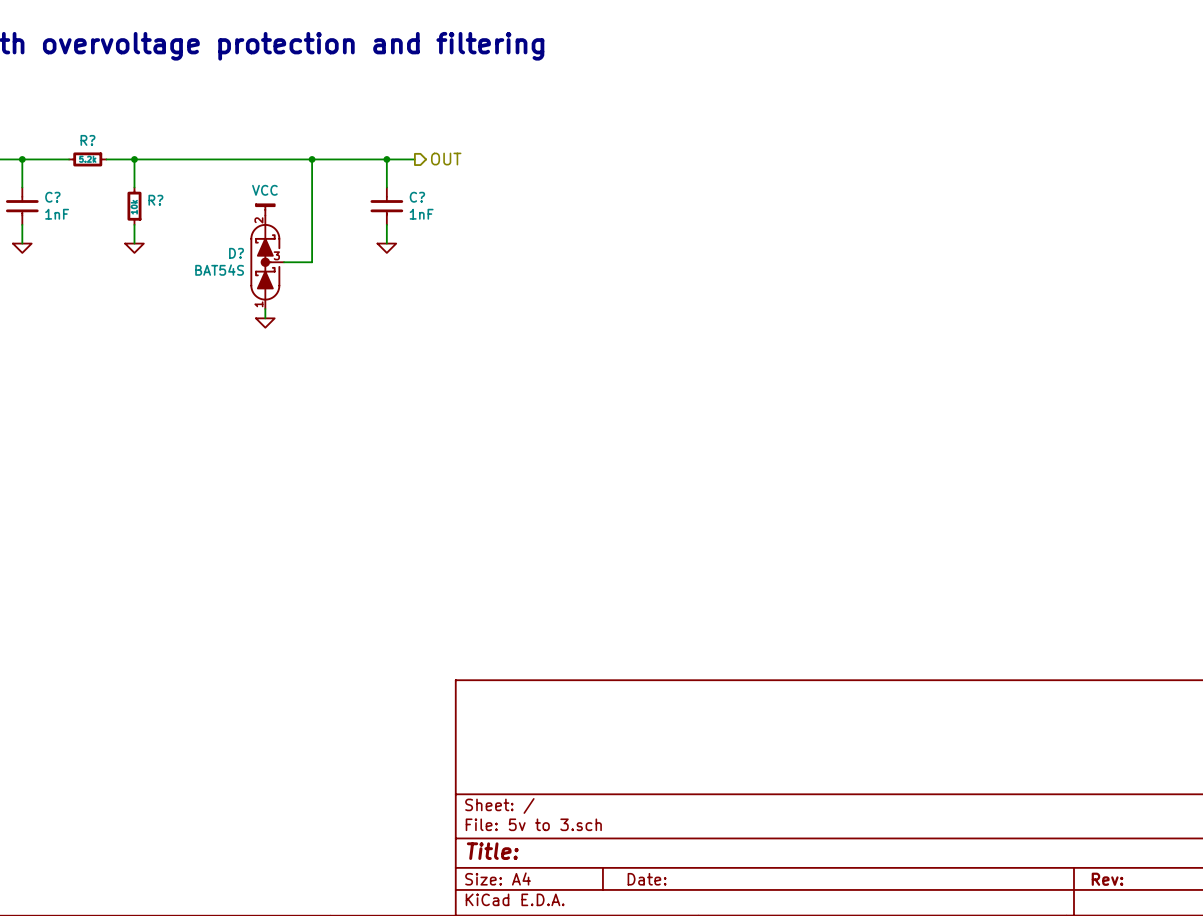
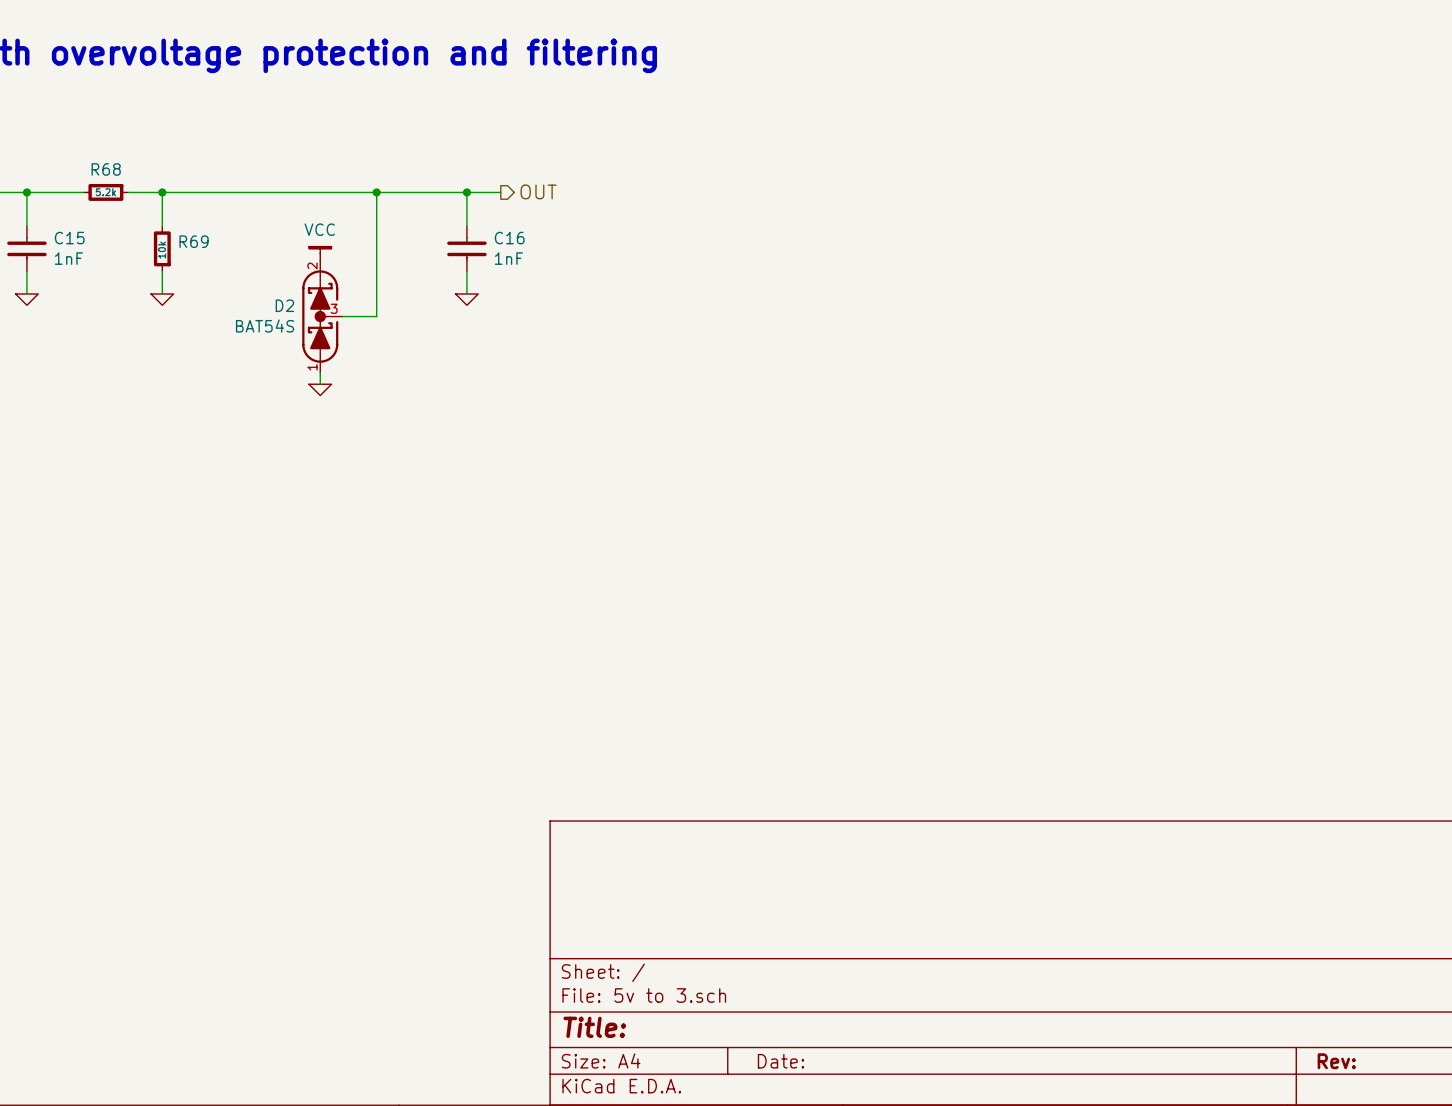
R? name: R? (87, 140) -> R68 (106, 169)
C? name: C? (52, 197) -> C15 (69, 238)
C? name: C? (417, 197) -> C16 (509, 238)
R? name: R? (155, 200) -> R69 (194, 241)
D? name: D? (236, 253) -> D2 (284, 305)

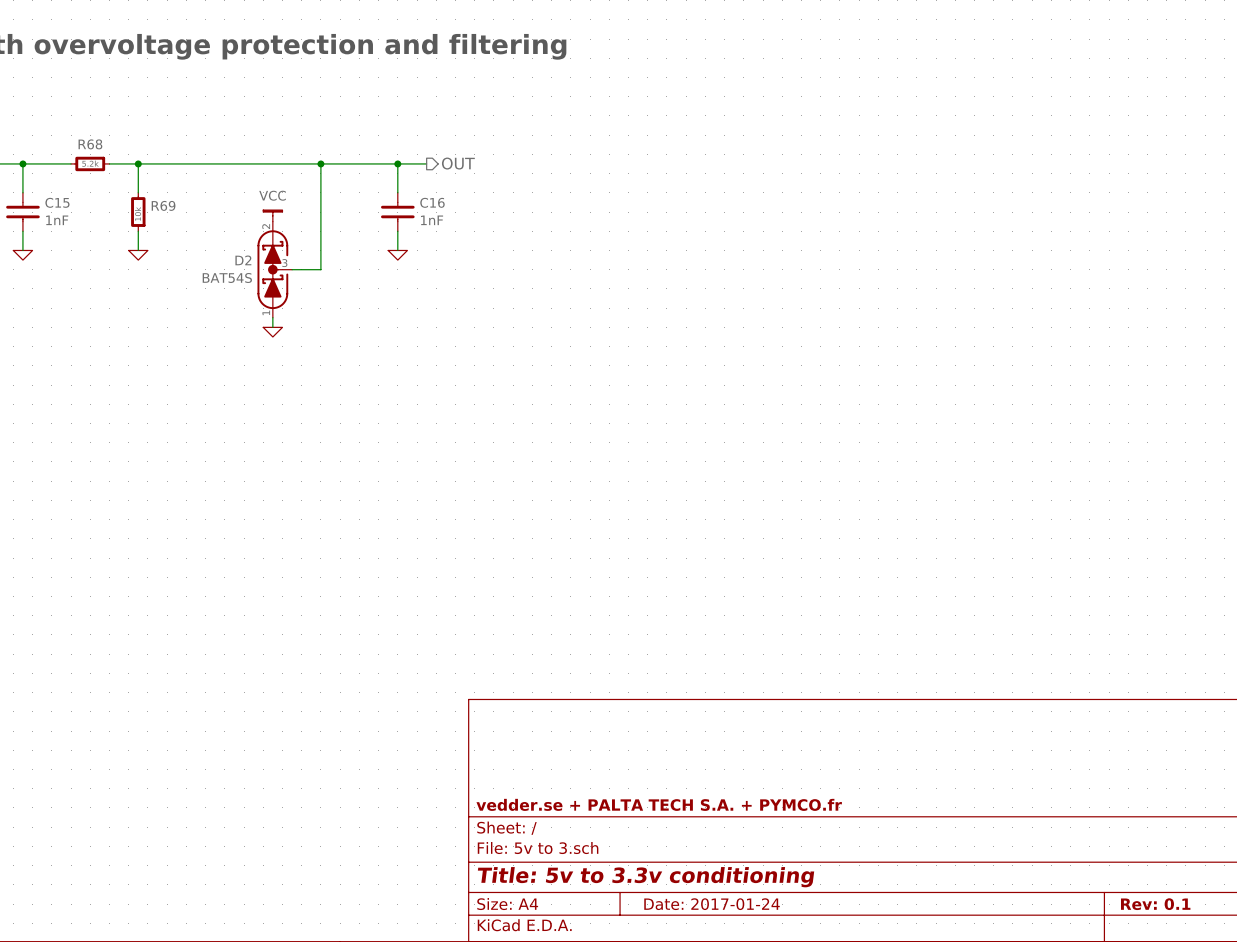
title block: none -> vedder.se + PALTA TECH S.A. + PYMCO.fr (659, 804)
title block: Title: (594, 1027) -> Title: 5v to 3.3v conditioning (646, 877)
title block: Date: (780, 1061) -> Date: 2017-01-24 (712, 904)
title block: Rev: (1336, 1061) -> Rev: 0.1 (1155, 904)

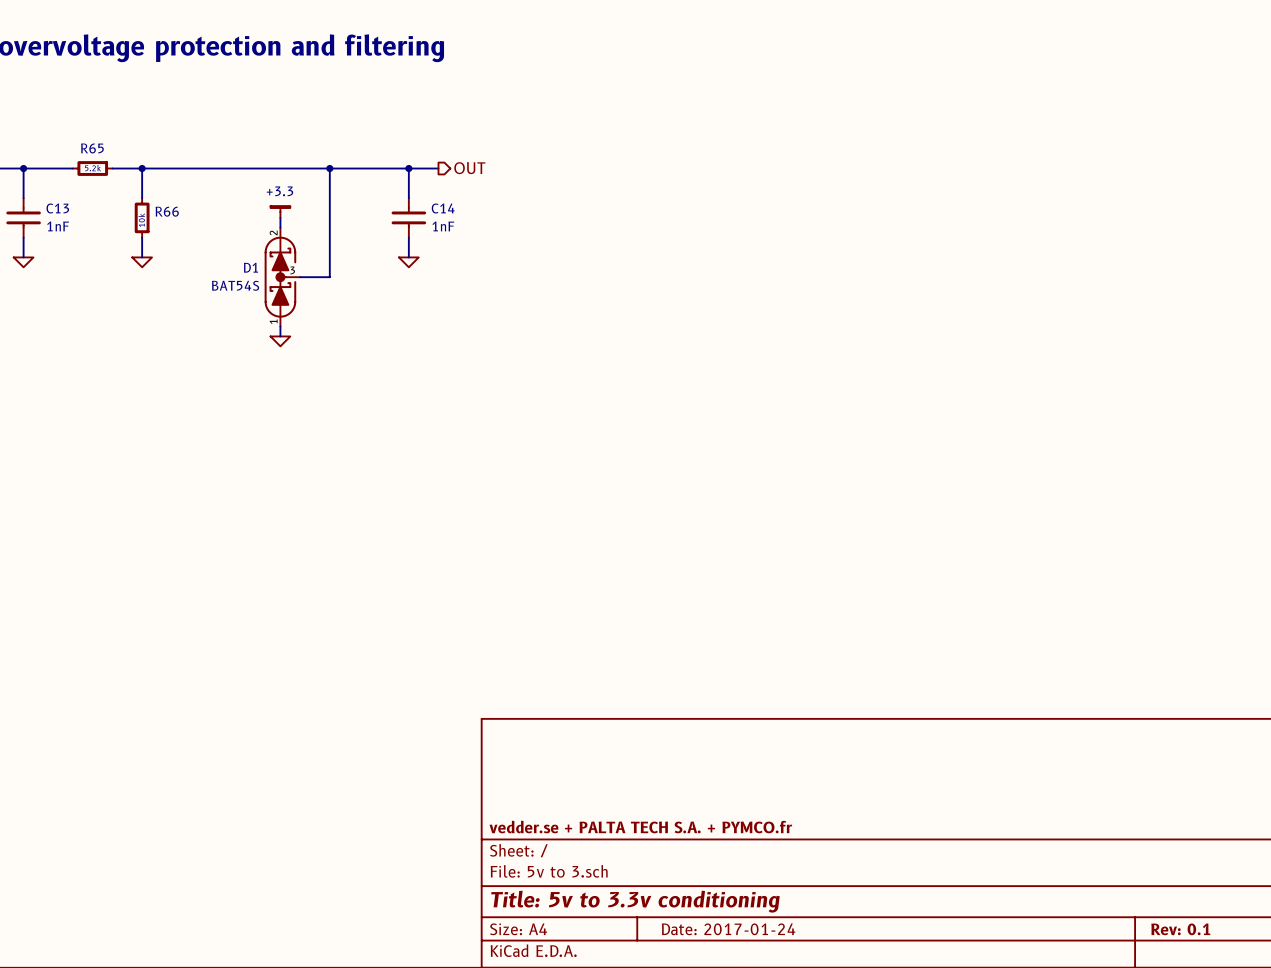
R68 name: R68 (90, 144) -> R65 (92, 148)
C15 name: C15 (57, 202) -> C13 (57, 208)
C16 name: C16 (432, 202) -> C14 (443, 208)
R69 name: R69 (163, 205) -> R66 (167, 211)
power symbol: none -> +3.3 (280, 211)
power symbol: VCC (272, 215) -> none
D2 name: D2 (243, 260) -> D1 (250, 267)

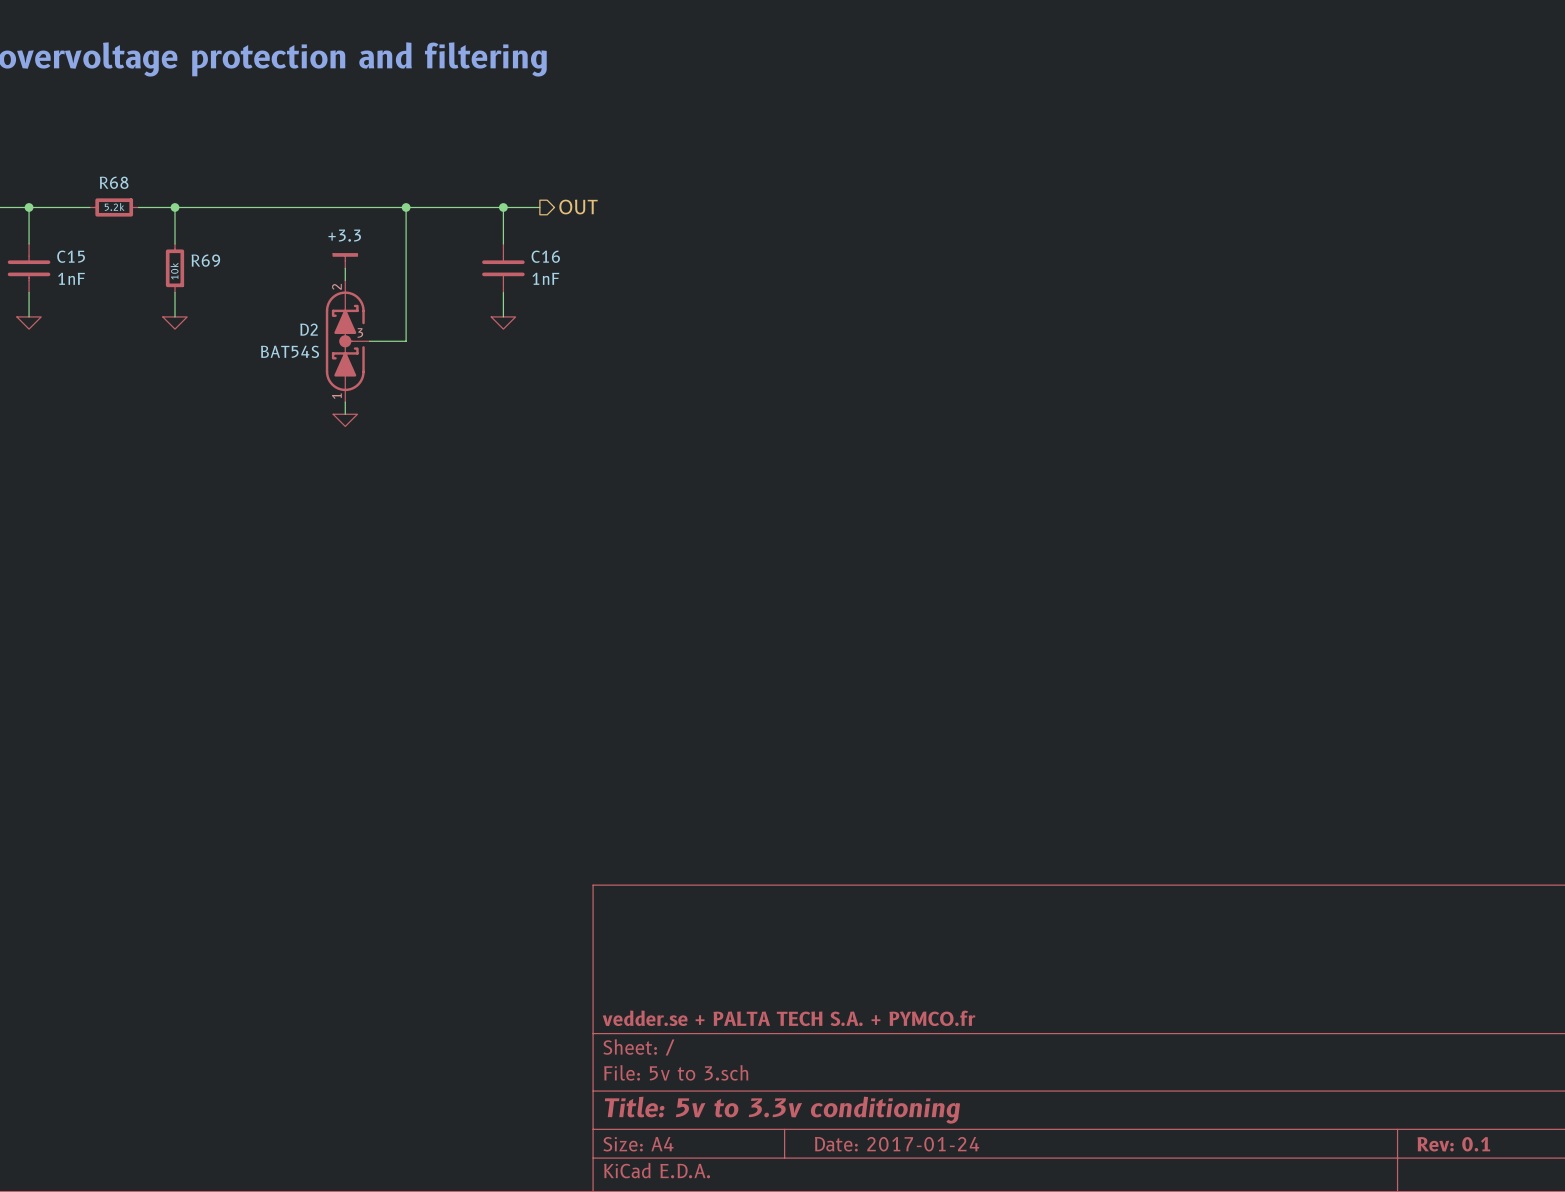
R65 name: R65 (92, 148) -> R68 (114, 182)
C13 name: C13 (57, 208) -> C15 (71, 256)
C14 name: C14 (443, 208) -> C16 (545, 256)
R66 name: R66 (167, 211) -> R69 (205, 260)
D1 name: D1 (250, 267) -> D2 (309, 329)

